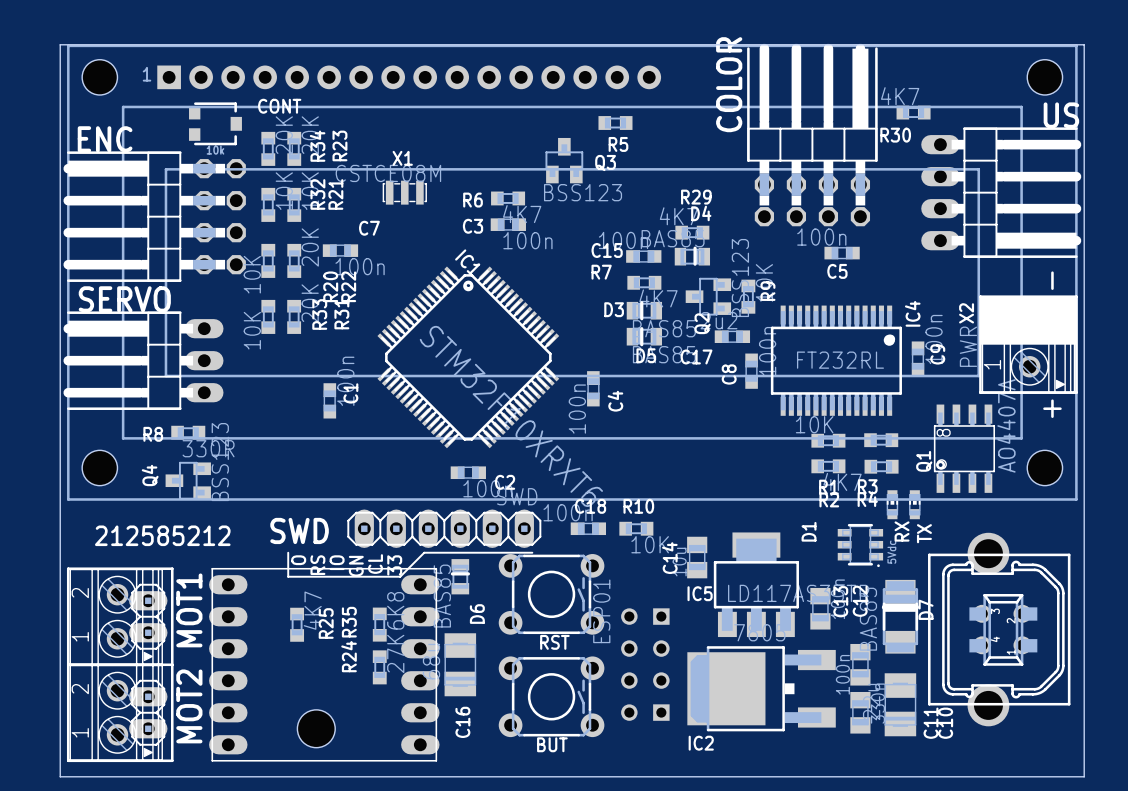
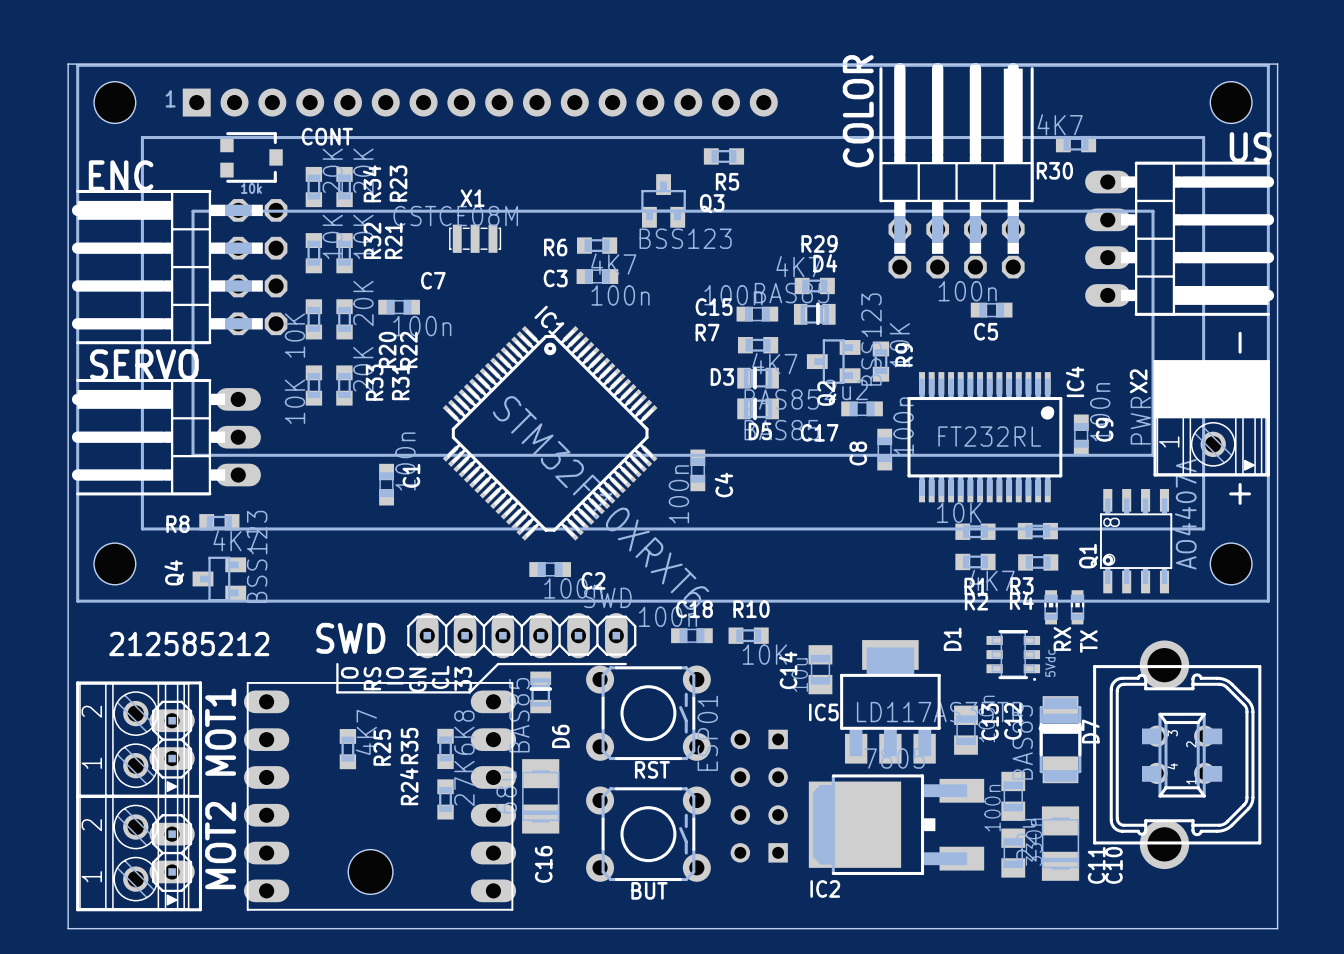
R8 value: 330R (208, 448) -> 4K7 (236, 540)

